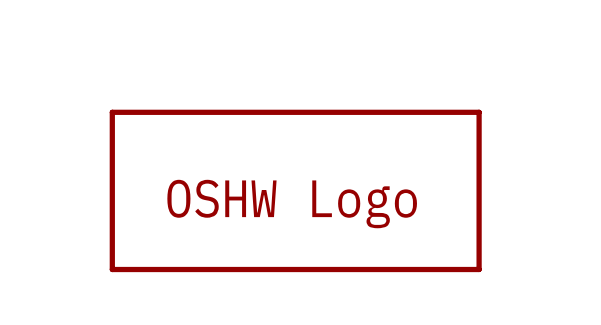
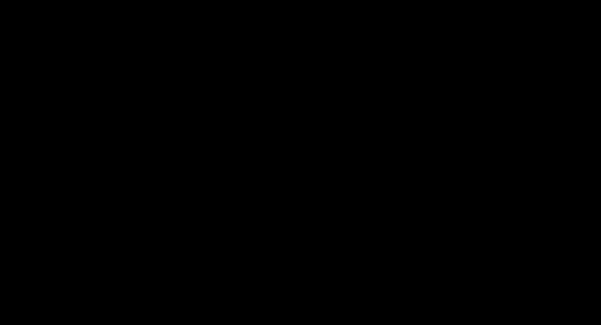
part: (295, 190) -> none

